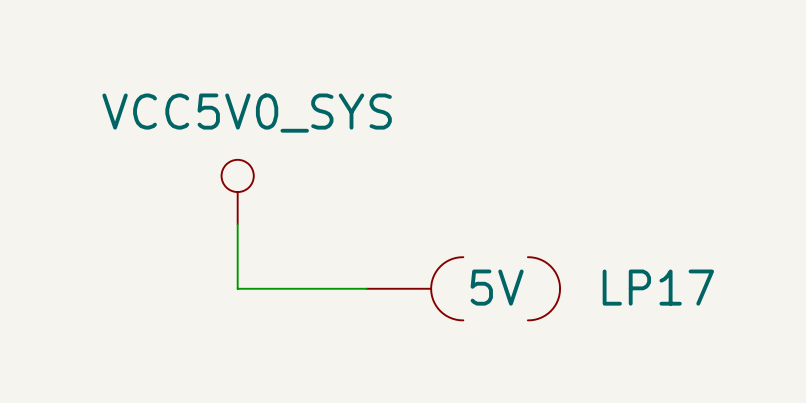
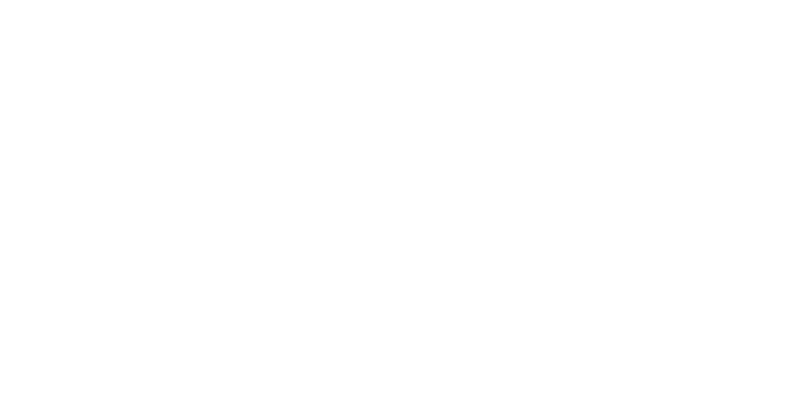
power symbol: VCC5V0_SYS (237, 192) -> none
wire: (237, 224) (237, 288) (366, 288) -> none
LP17: 5V (463, 288) -> none

